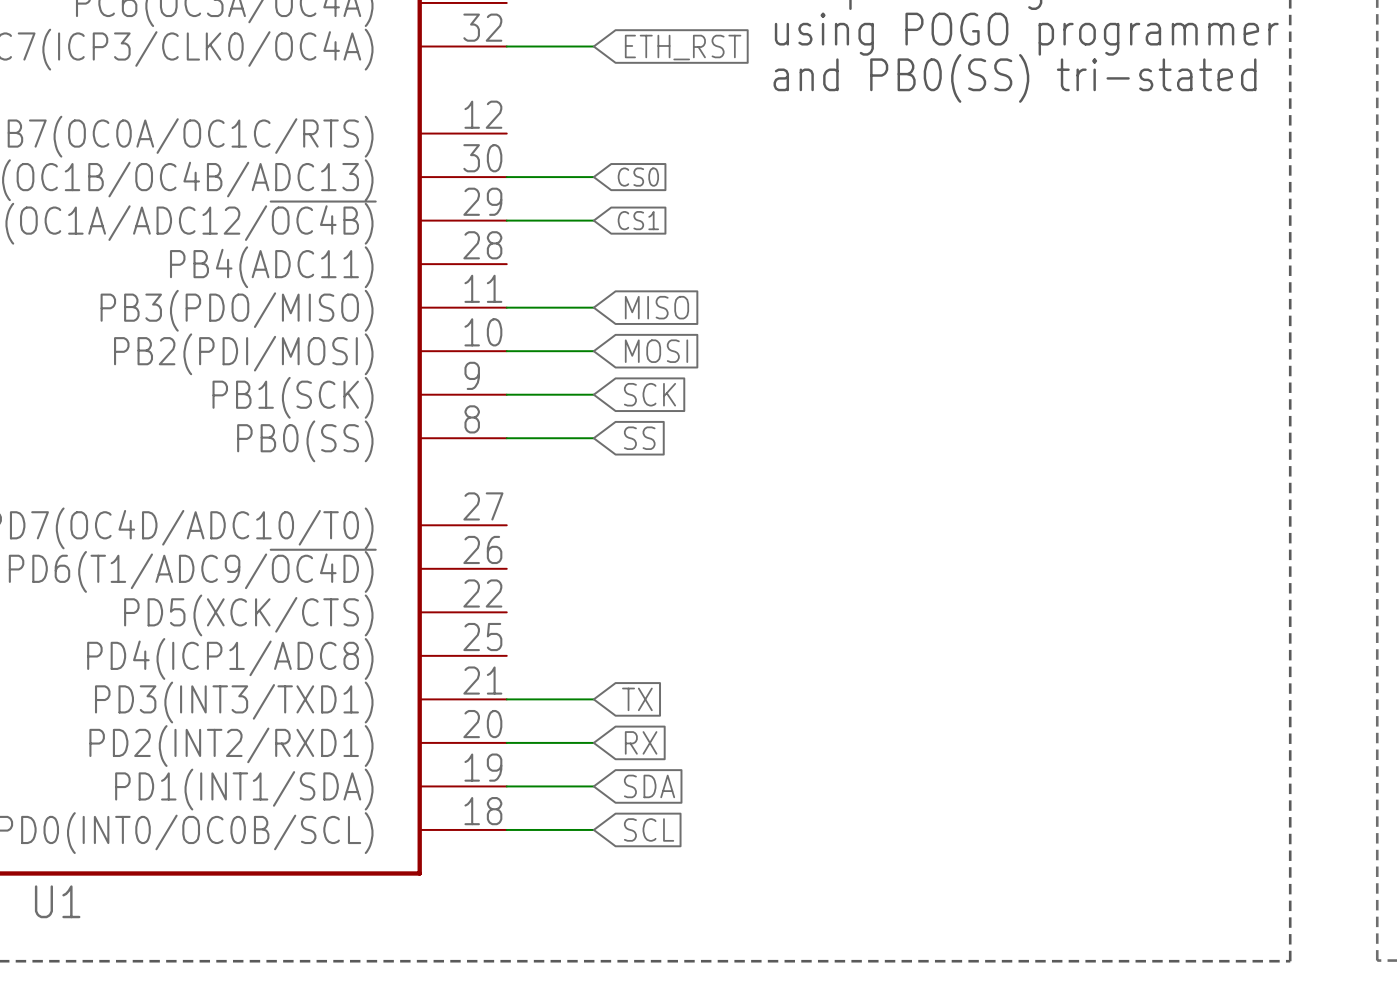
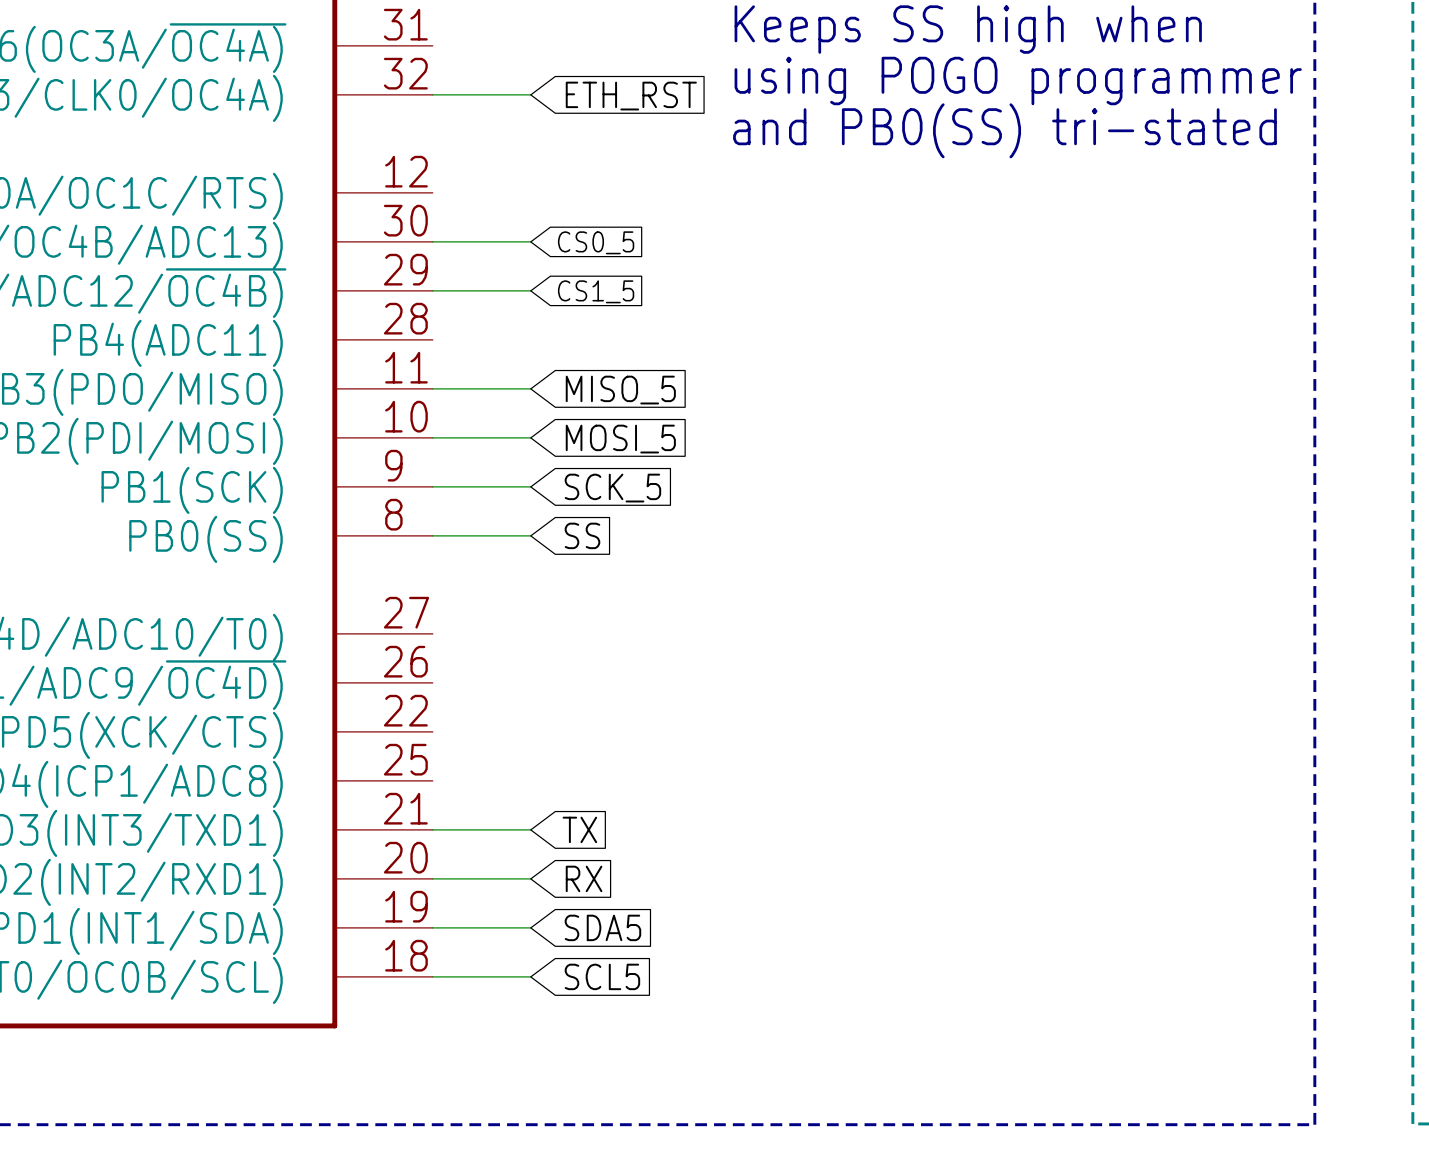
global label: CS0 (638, 177) -> CS0_5 (596, 242)
global label: CS1 (638, 220) -> CS1_5 (596, 291)
global label: MISO (656, 307) -> MISO_5 (620, 390)
global label: MOSI (656, 351) -> MOSI_5 (620, 439)
global label: SCK (649, 394) -> SCK_5 (612, 488)
global label: SDA (649, 786) -> SDA5 (602, 927)
global label: SCL (649, 829) -> SCL5 (602, 976)

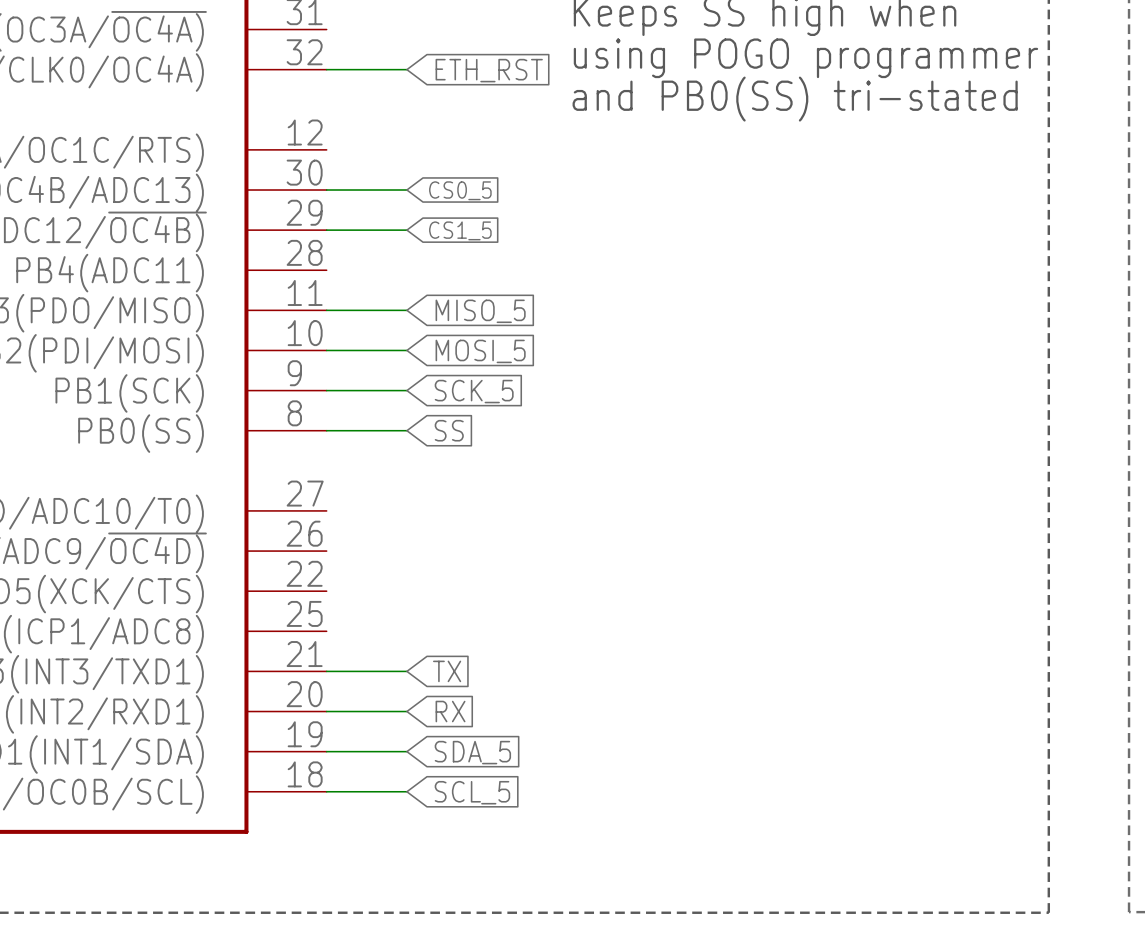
global label: SDA5 (602, 927) -> SDA_5 (472, 752)
global label: SCL5 (602, 976) -> SCL_5 (472, 792)

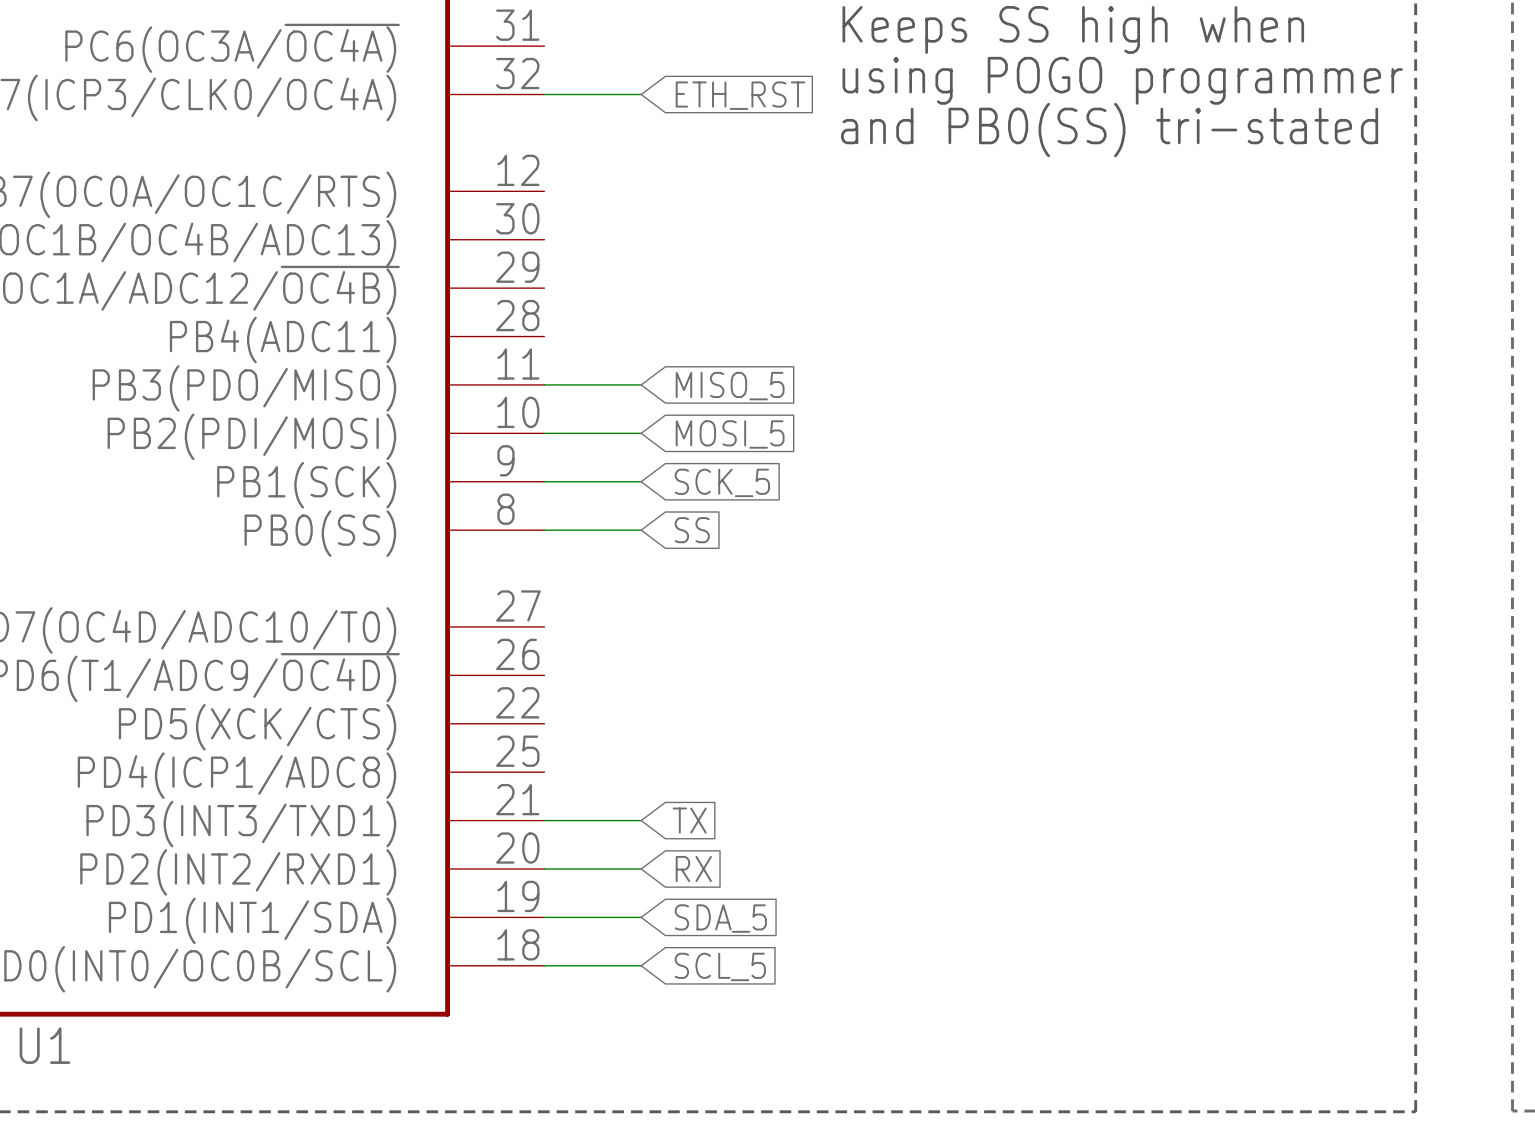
wire: (326, 190) (406, 190) -> none
global label: CS0_5 (460, 190) -> none
wire: (326, 230) (406, 230) -> none
global label: CS1_5 (460, 230) -> none

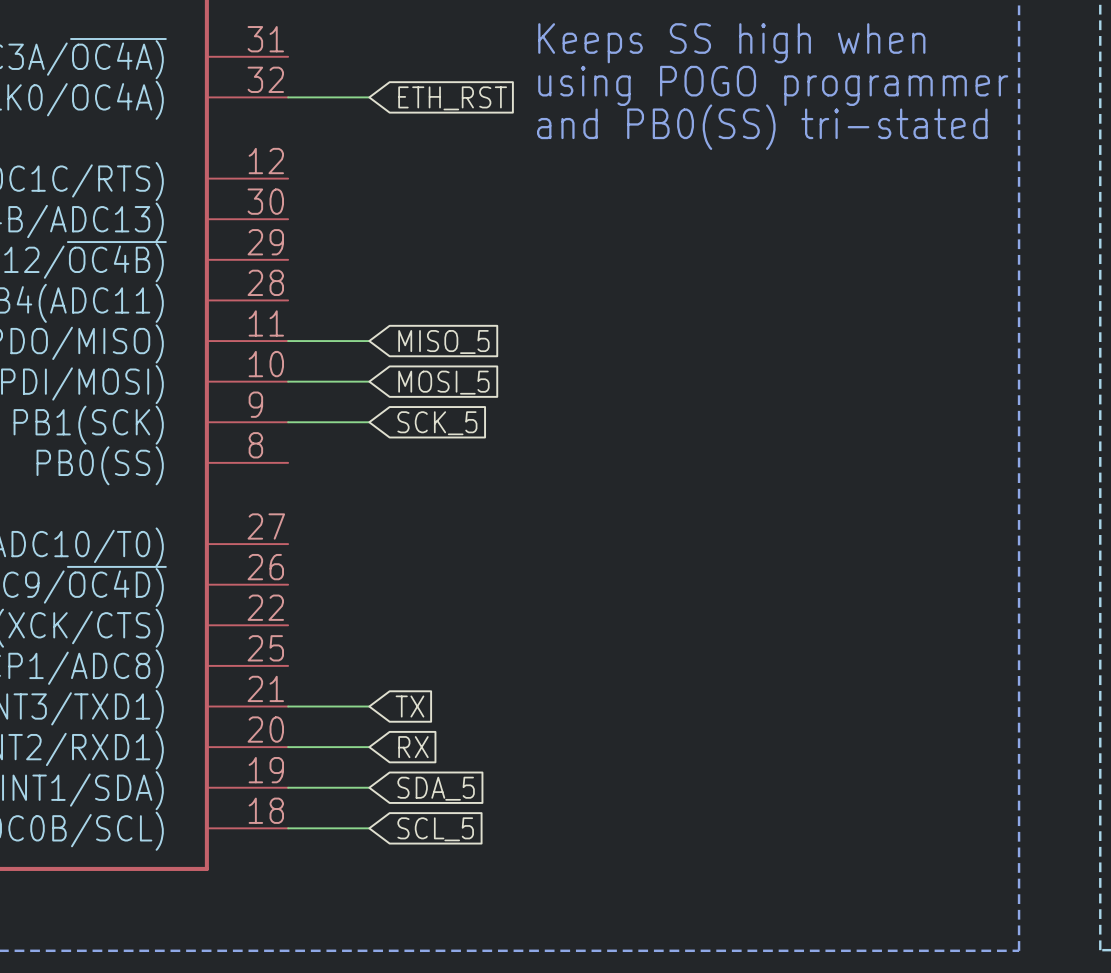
wire: (544, 530) (641, 530) -> none
global label: SS (692, 530) -> none

